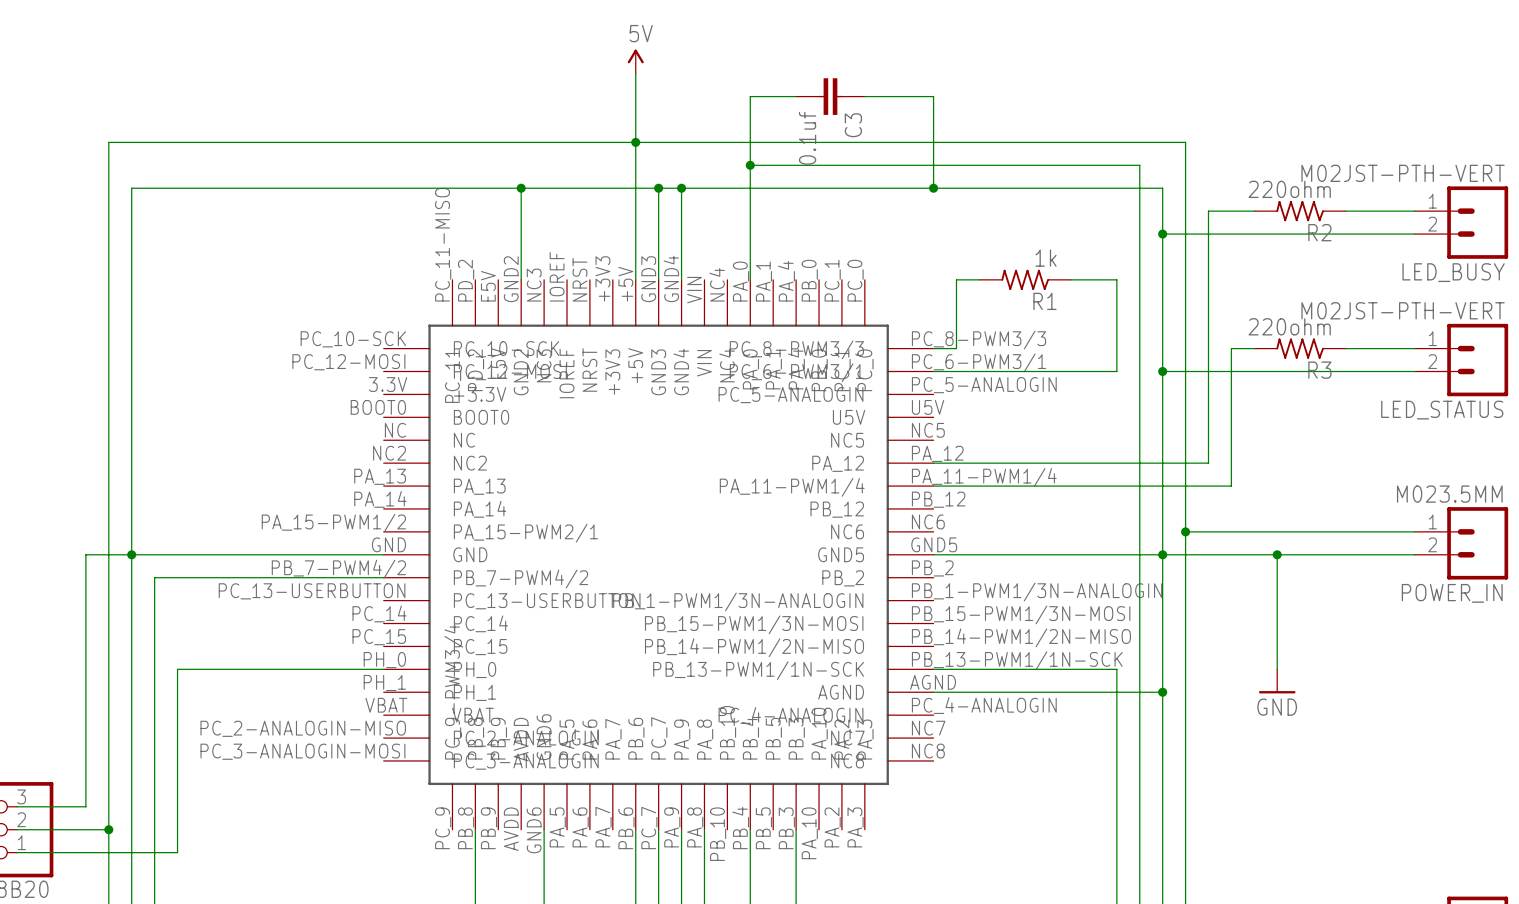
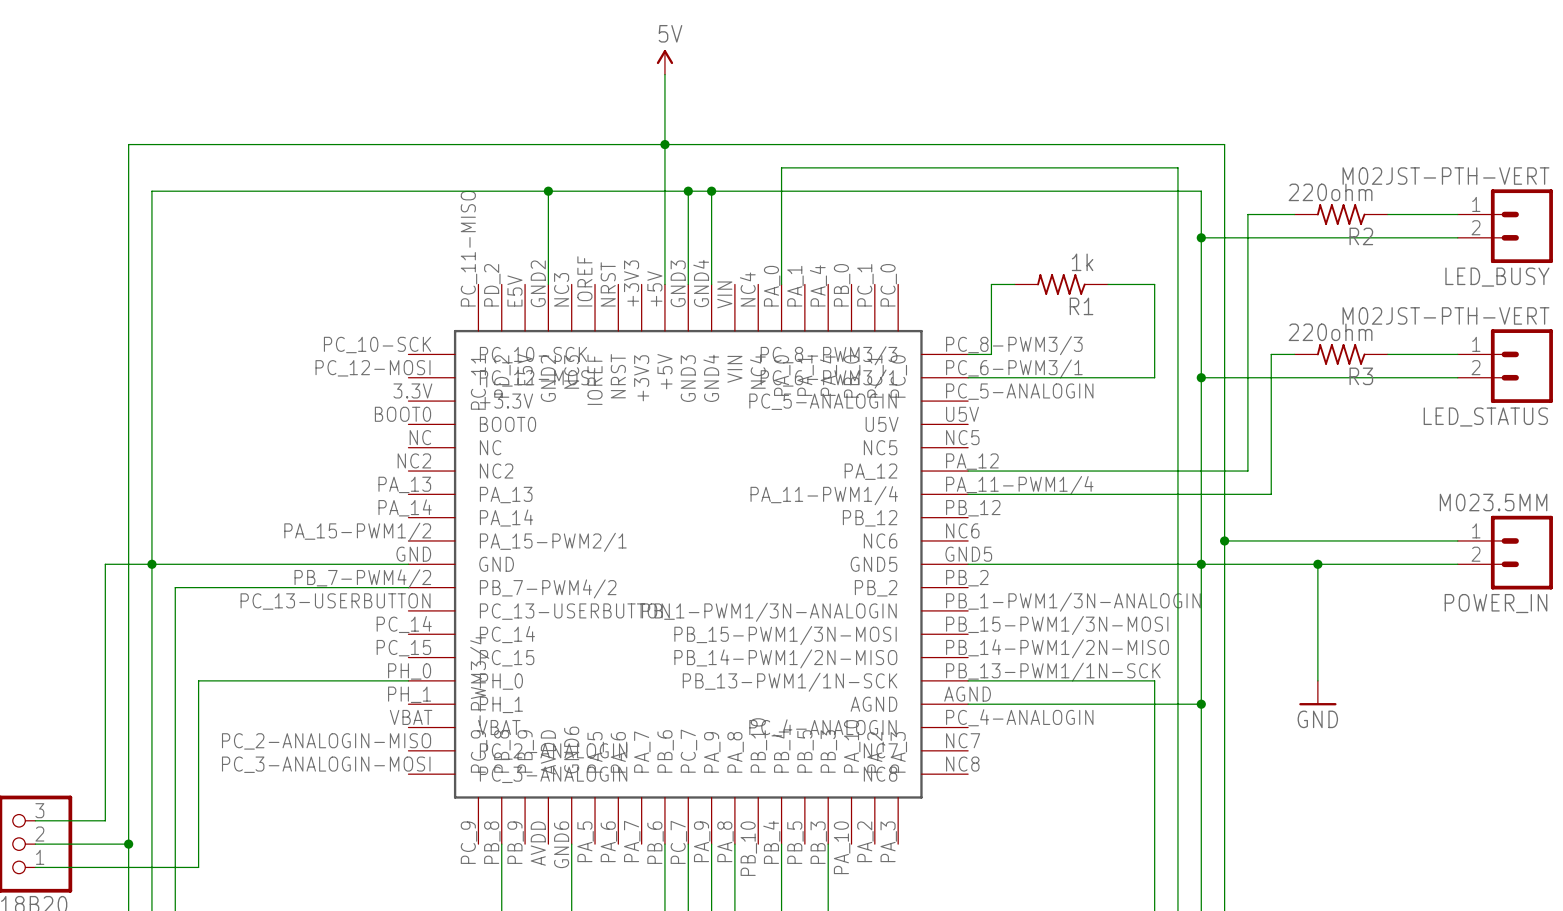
wire: (796, 96) (750, 96) (750, 165) -> none
C3: 0.1uf (830, 96) -> none
wire: (864, 96) (933, 96) (933, 188) -> none
junction: (750, 165) -> none
junction: (933, 188) -> none

